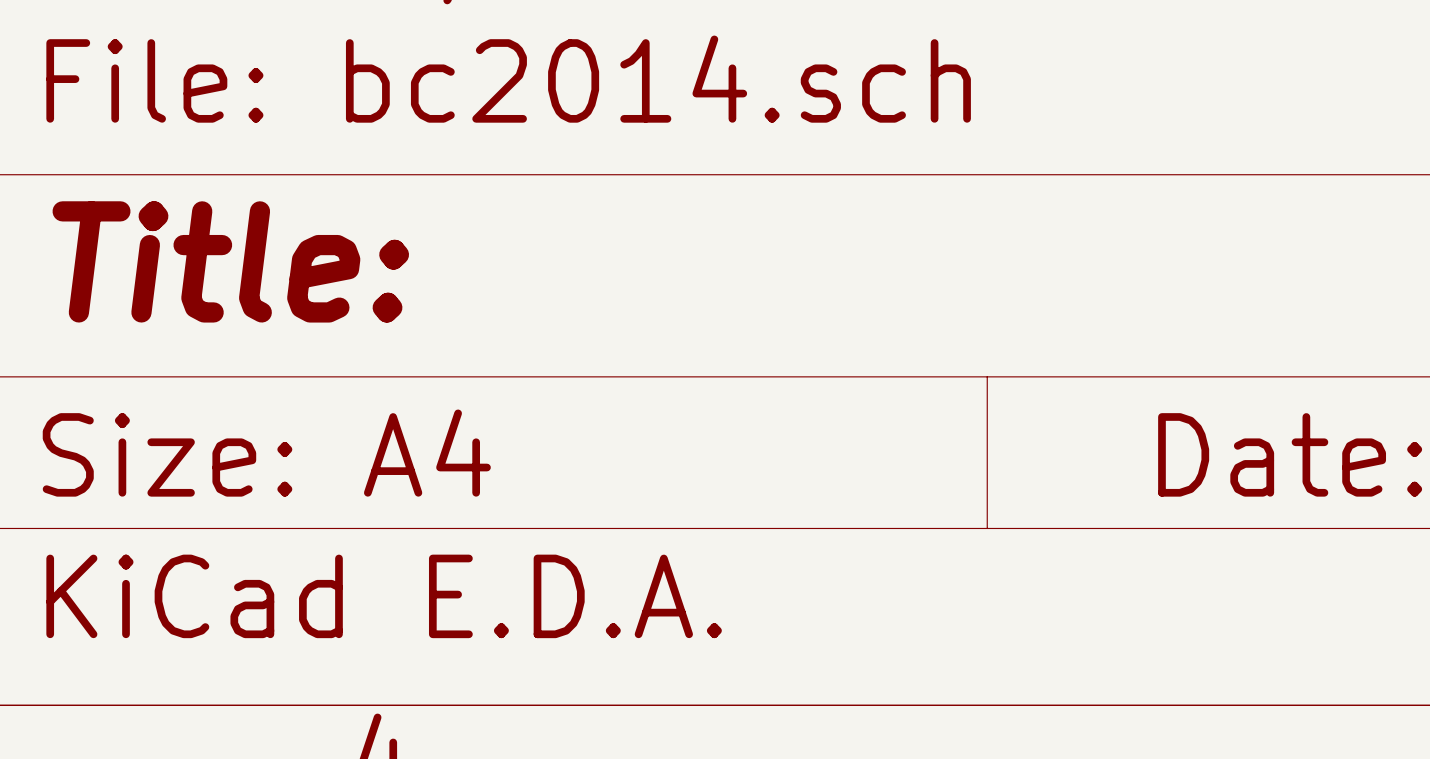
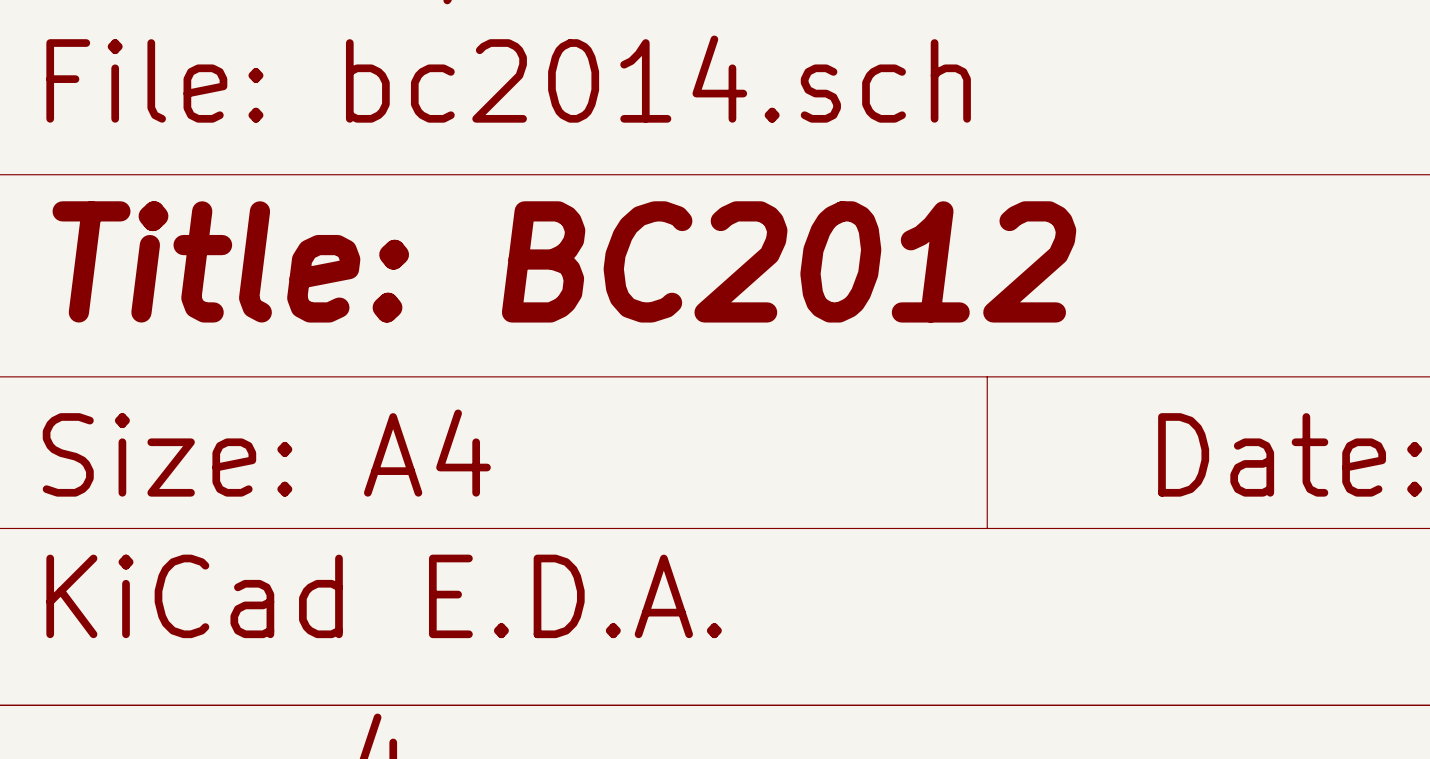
title block: Title: (230, 261) -> Title: BC2012 (564, 261)

